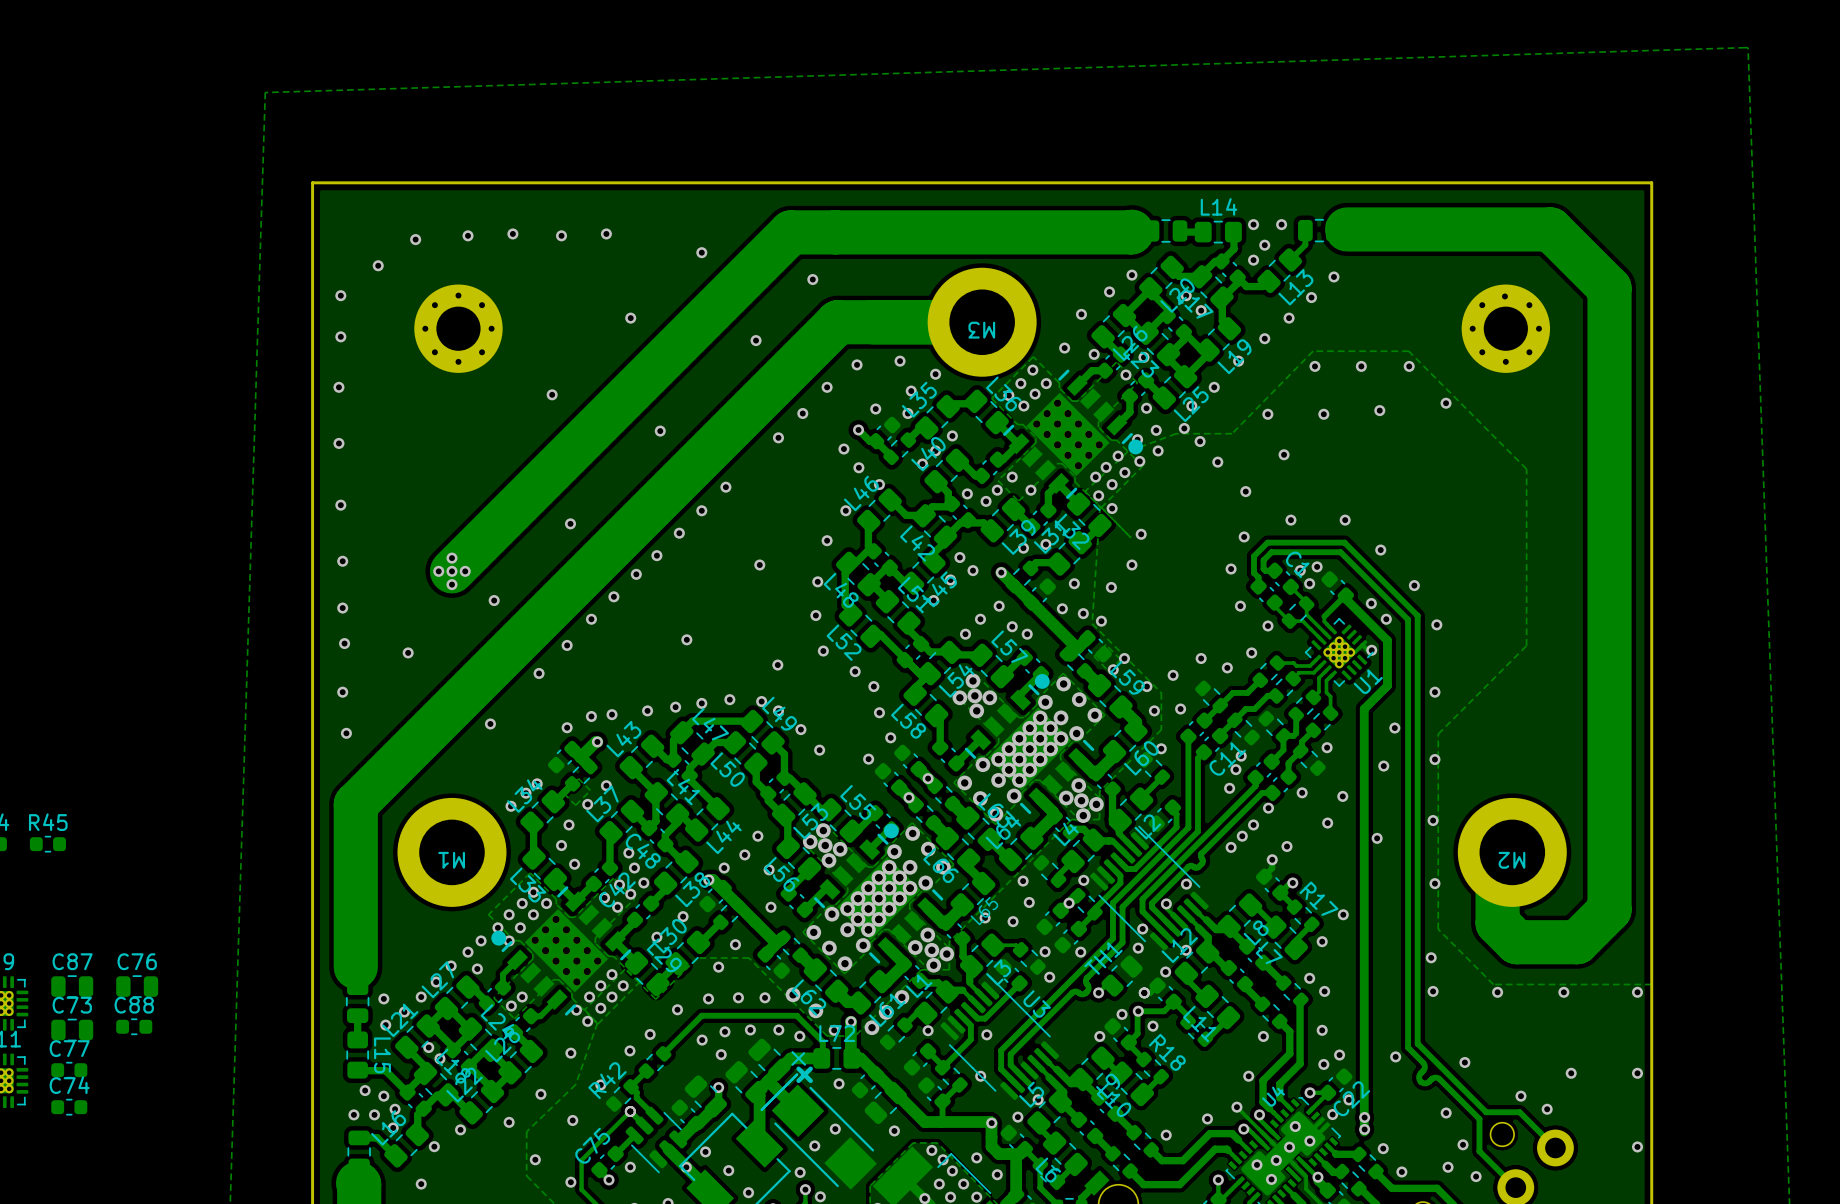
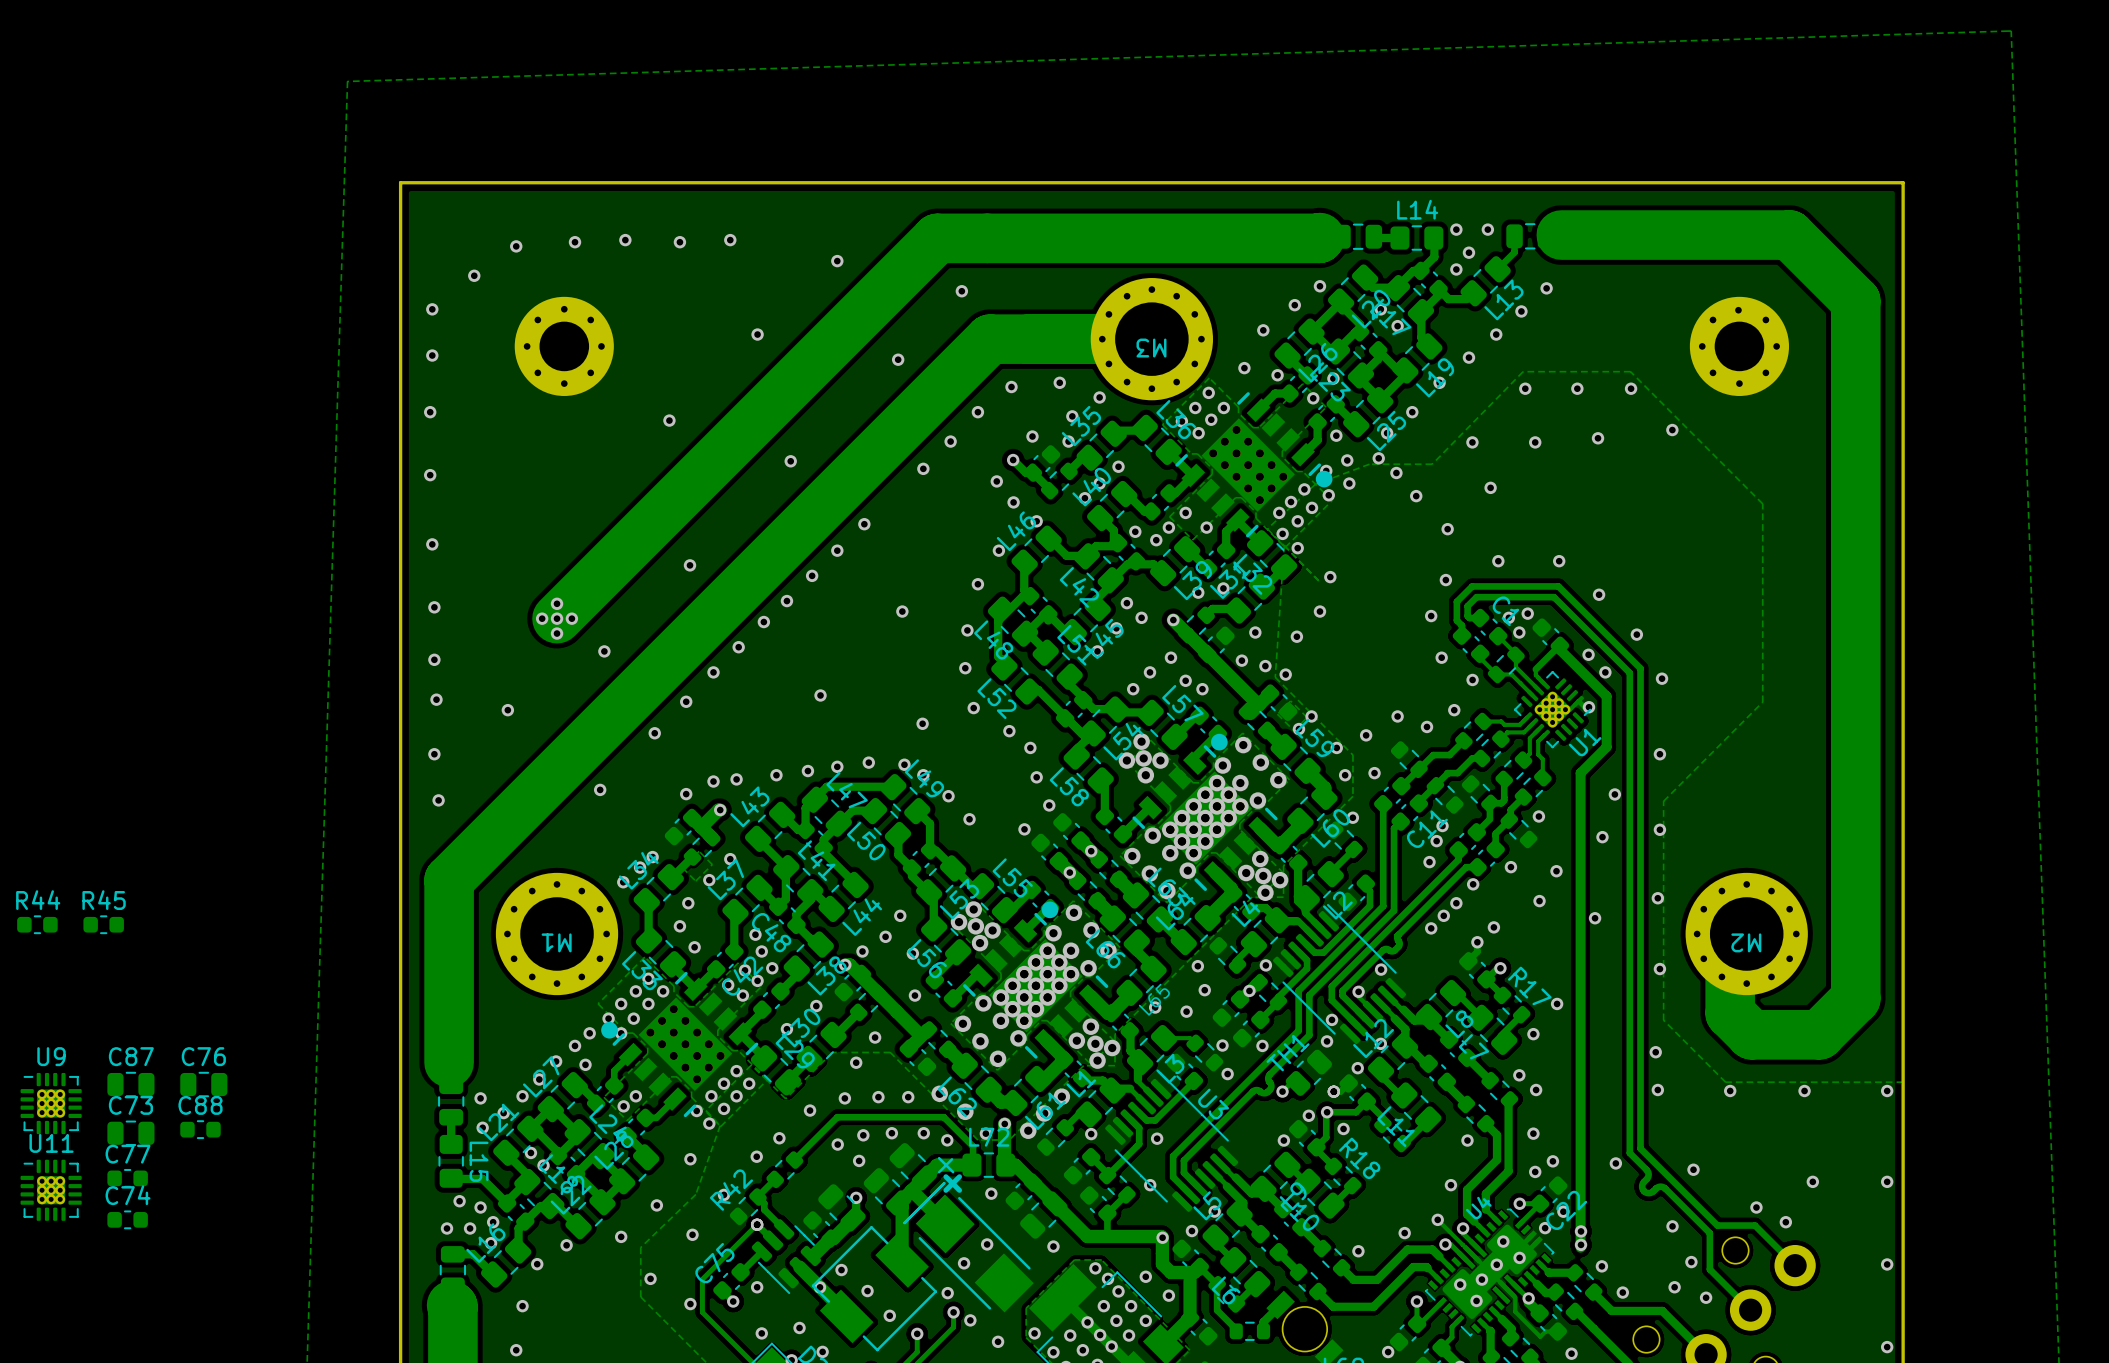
M3 footprint: [927, 267, 1037, 377] -> [1090, 278, 1214, 401]
M1 footprint: [397, 797, 507, 907] -> [495, 872, 619, 996]
M2 footprint: [1457, 797, 1567, 907] -> [1685, 872, 1808, 996]

